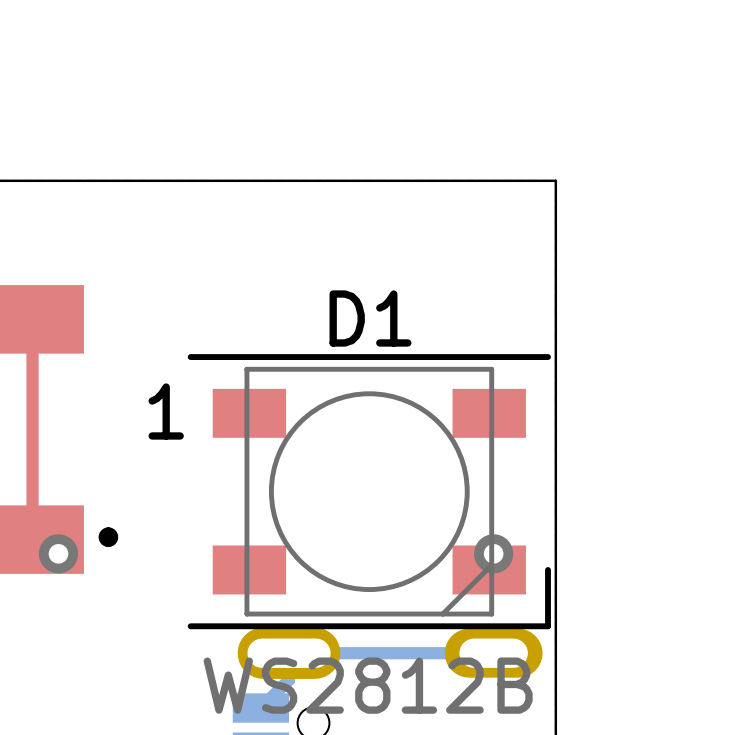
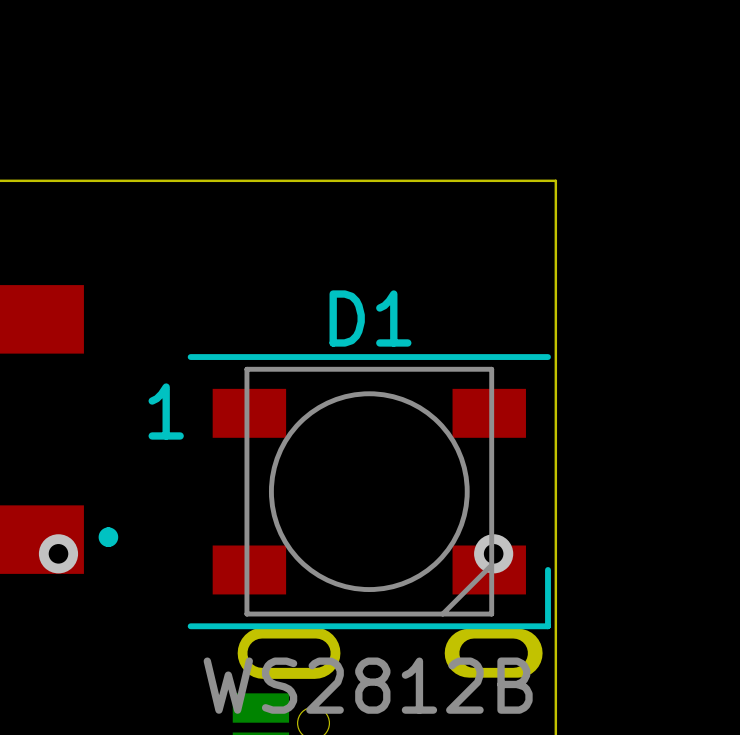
top track: (32, 319) (32, 527) (58, 553) -> none
bottom track: (493, 653) (289, 653) (289, 679) (260, 708) -> none

